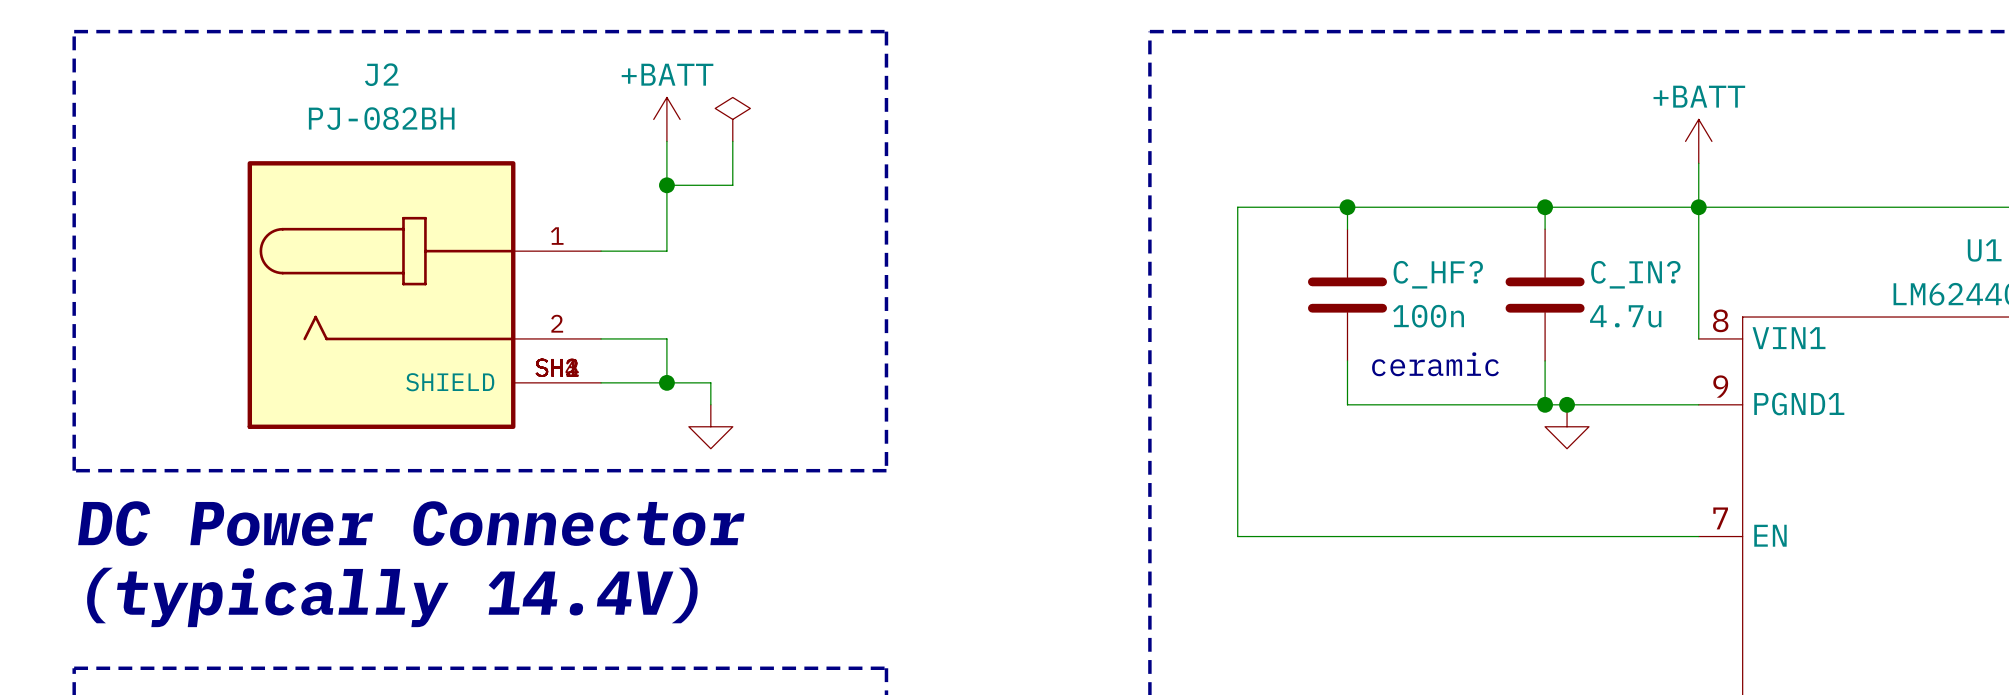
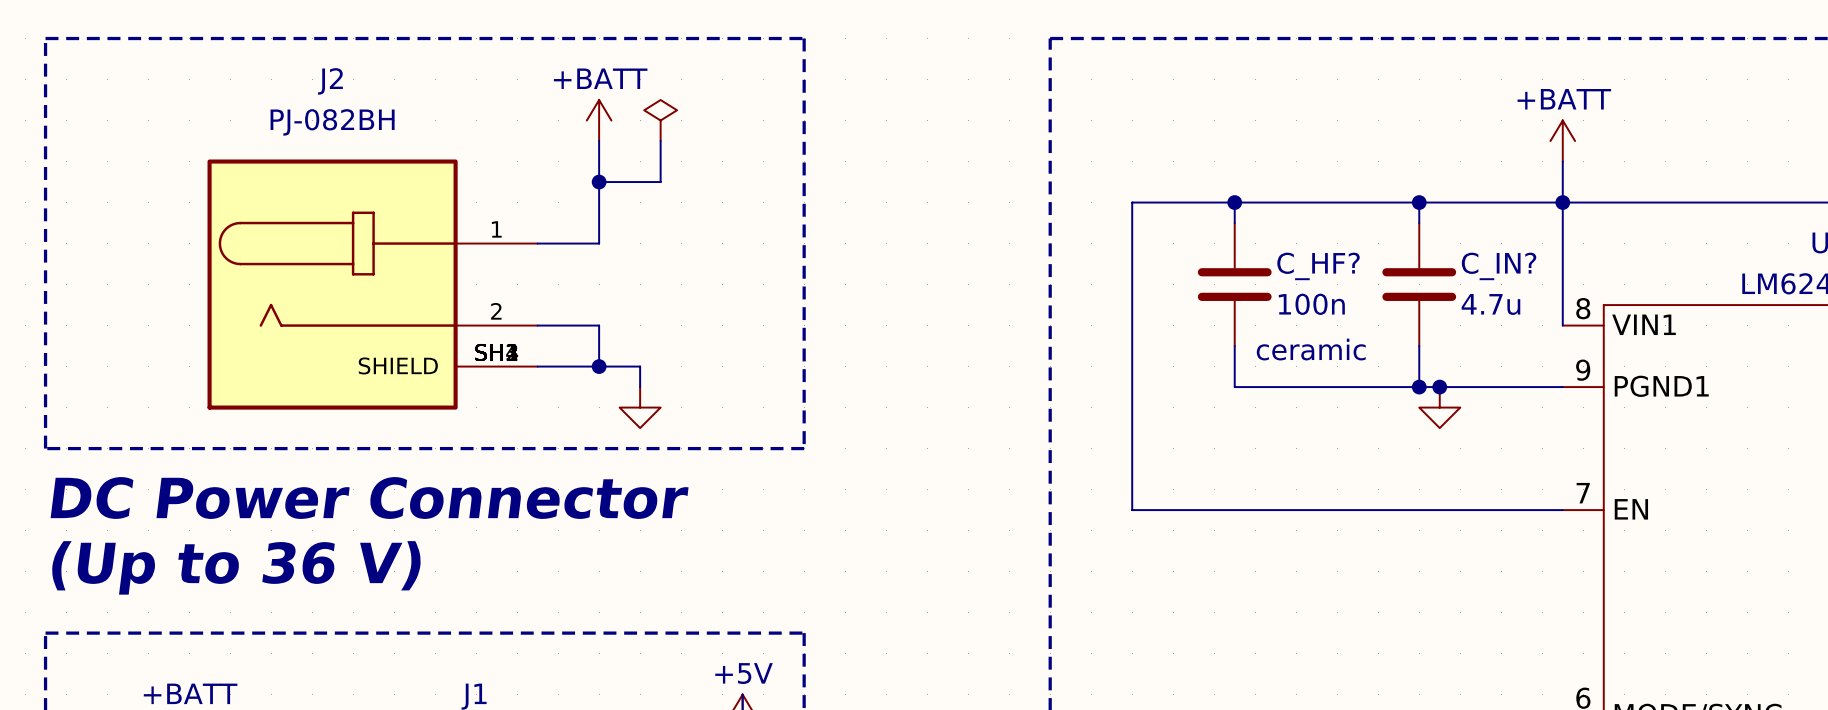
text: (typically 14.4V) (392, 597) -> (Up to 36 V) (236, 567)

